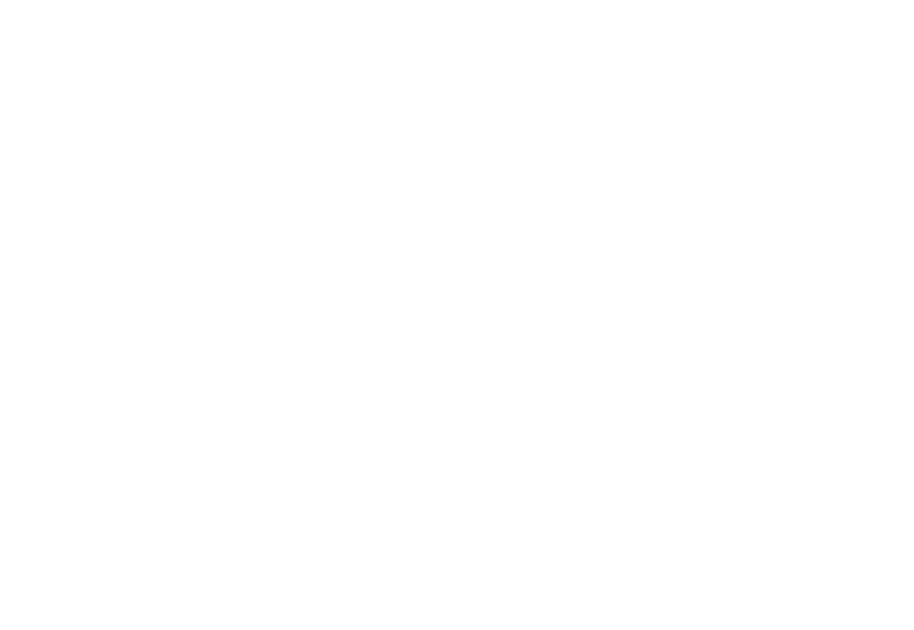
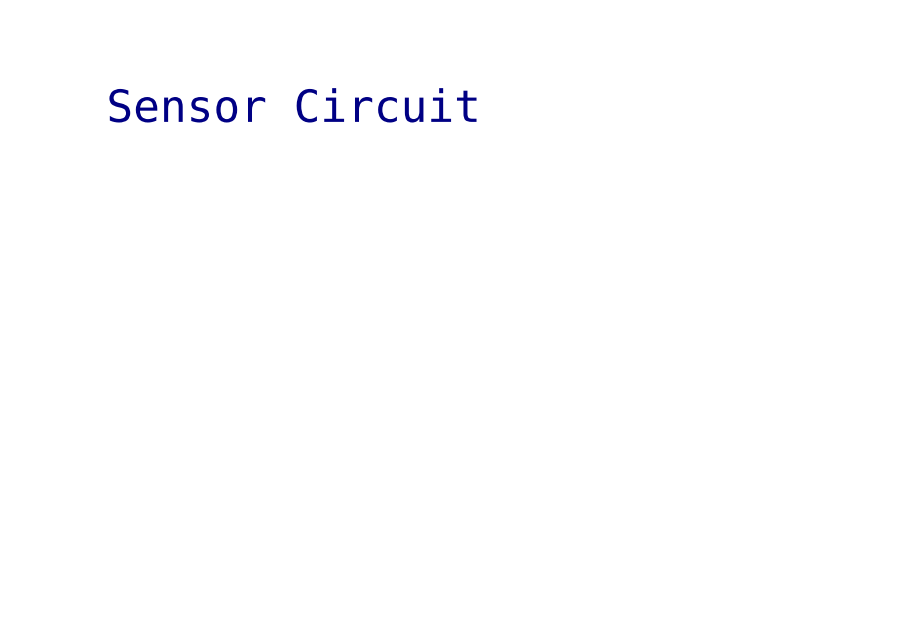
text: none -> Sensor Circuit (292, 105)

